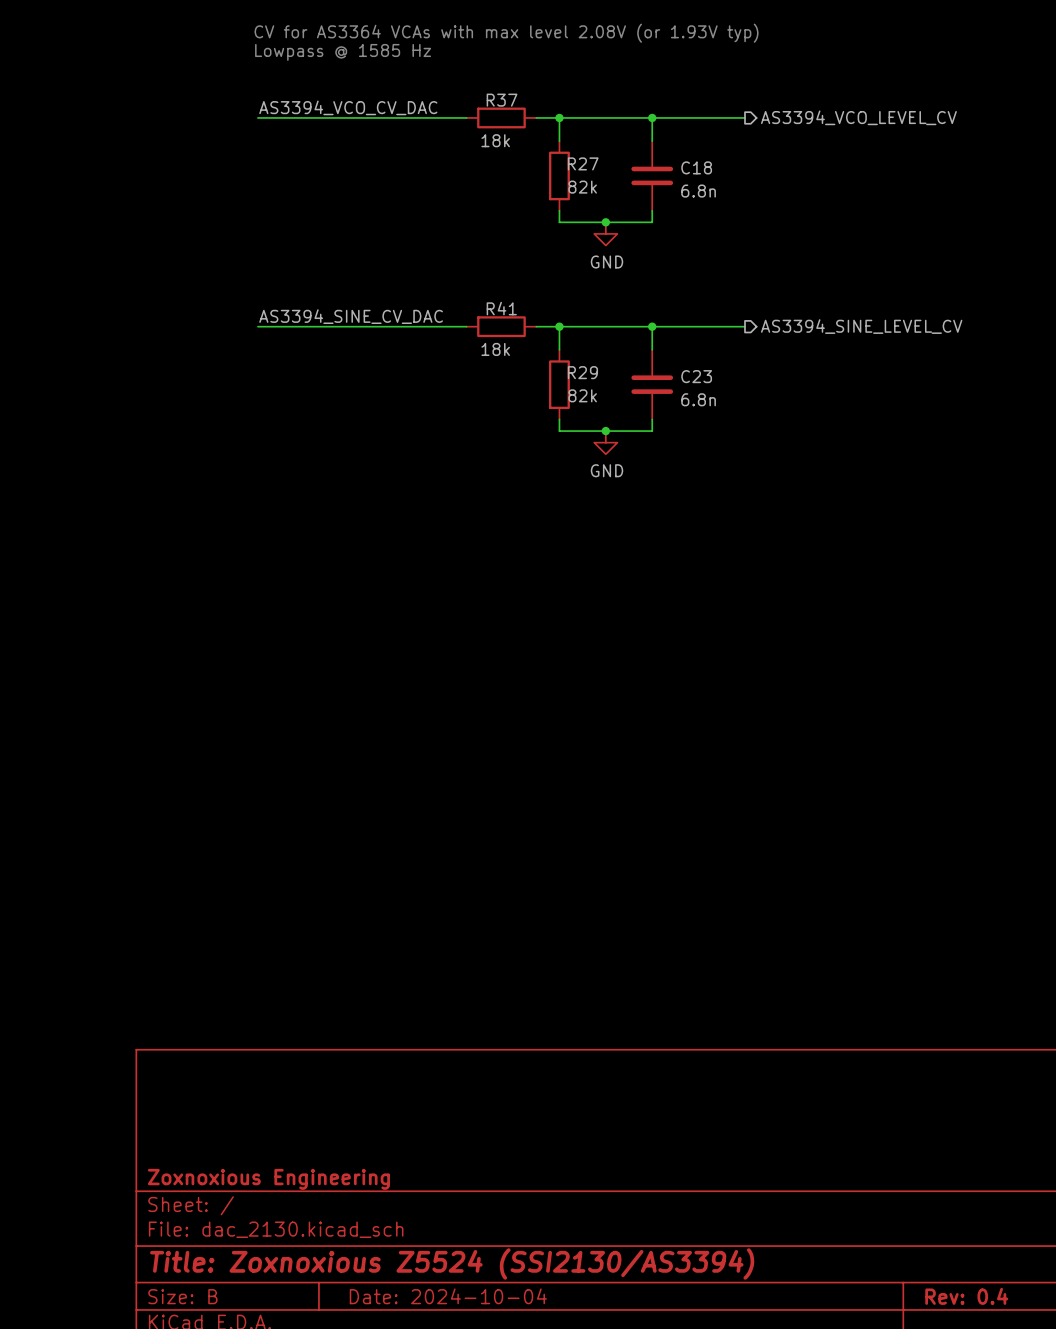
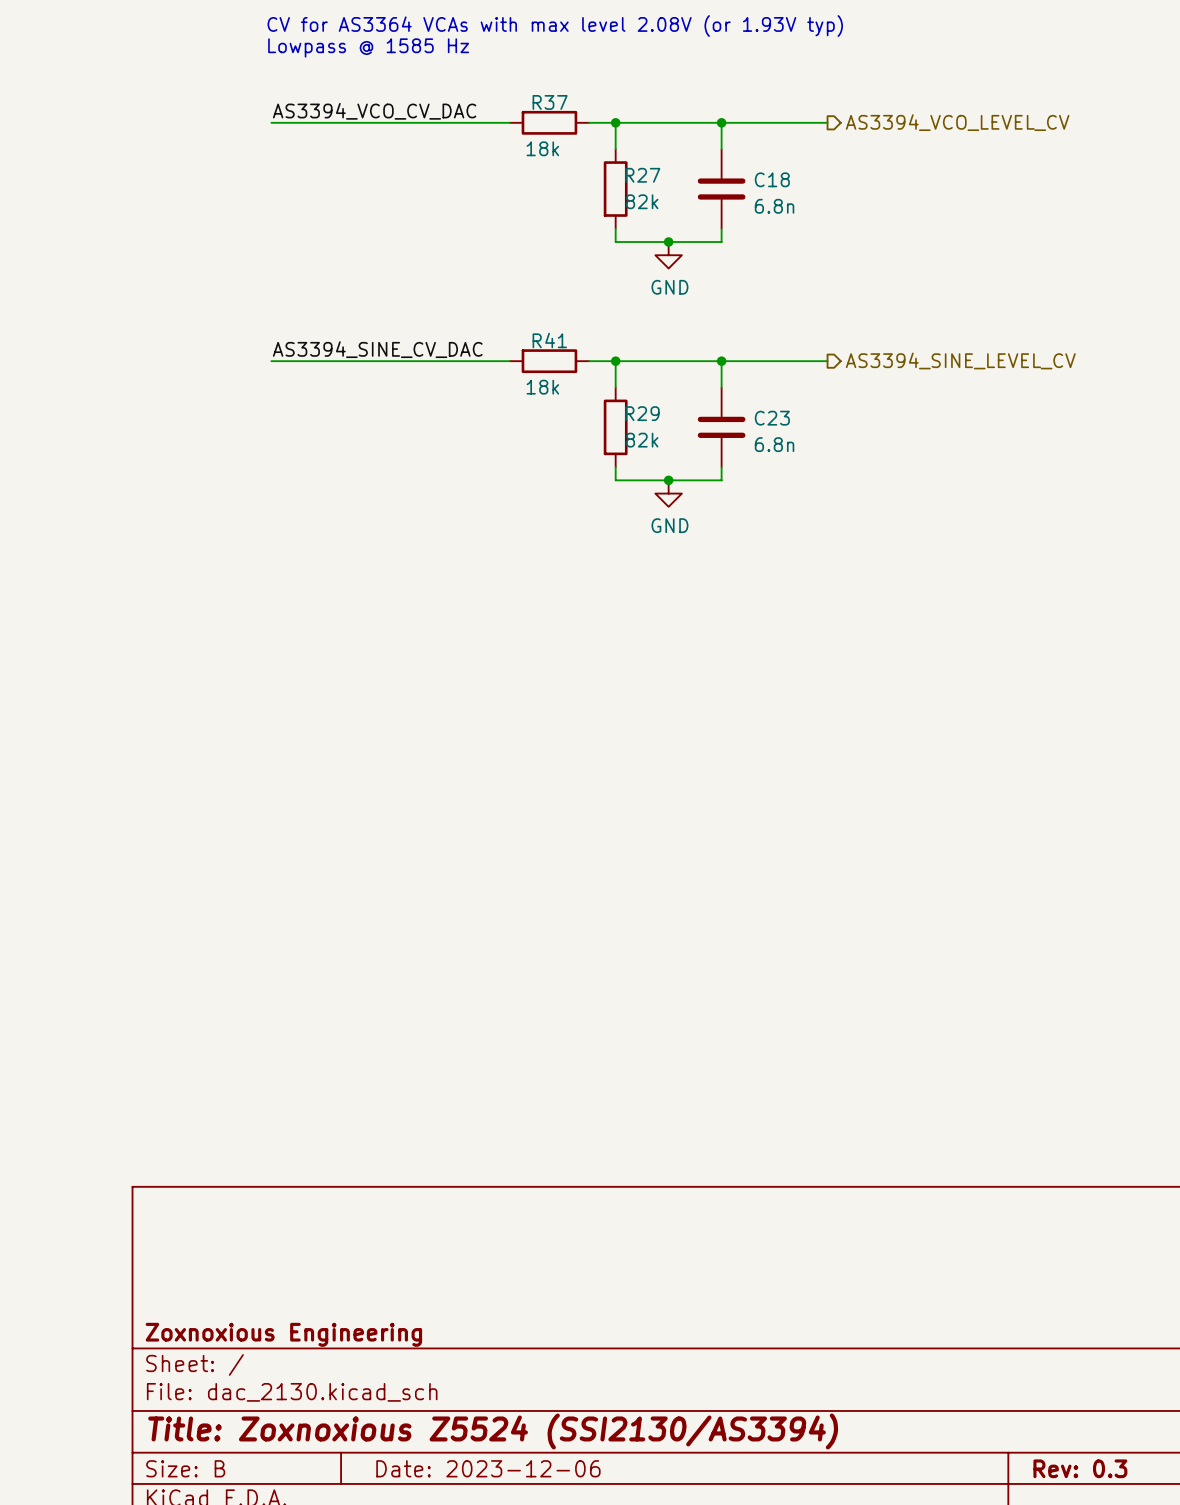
title block: Date: 2024-10-04 (448, 1296) -> Date: 2023-12-06 (488, 1468)
title block: Rev: 0.4 (966, 1296) -> Rev: 0.3 (1080, 1468)

